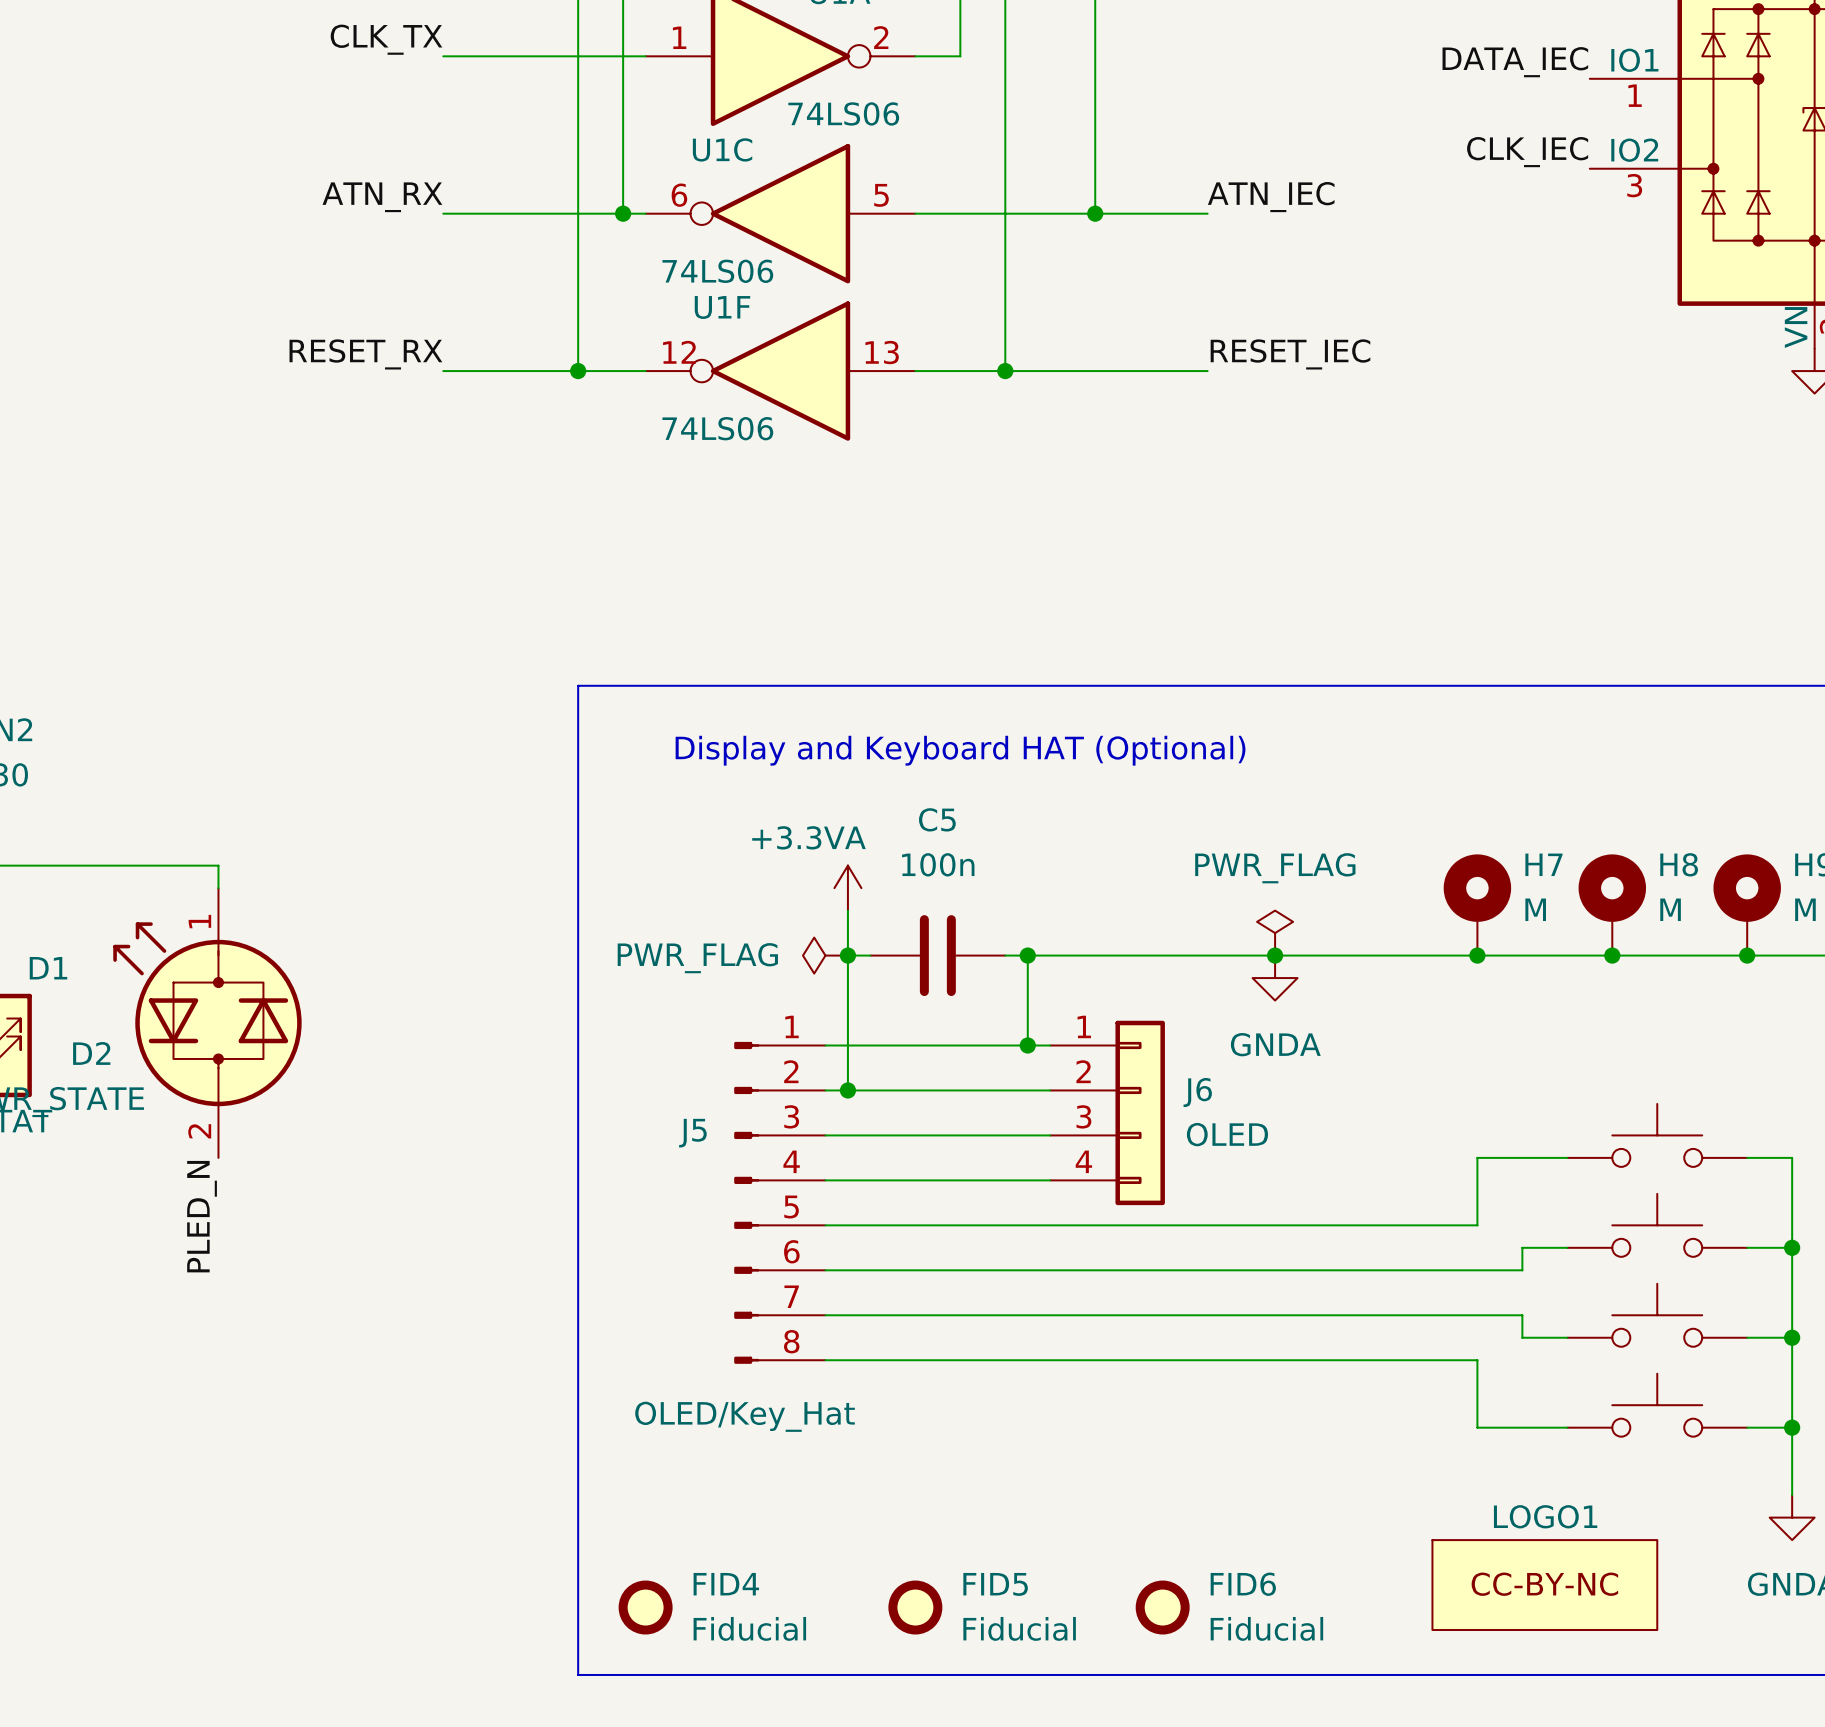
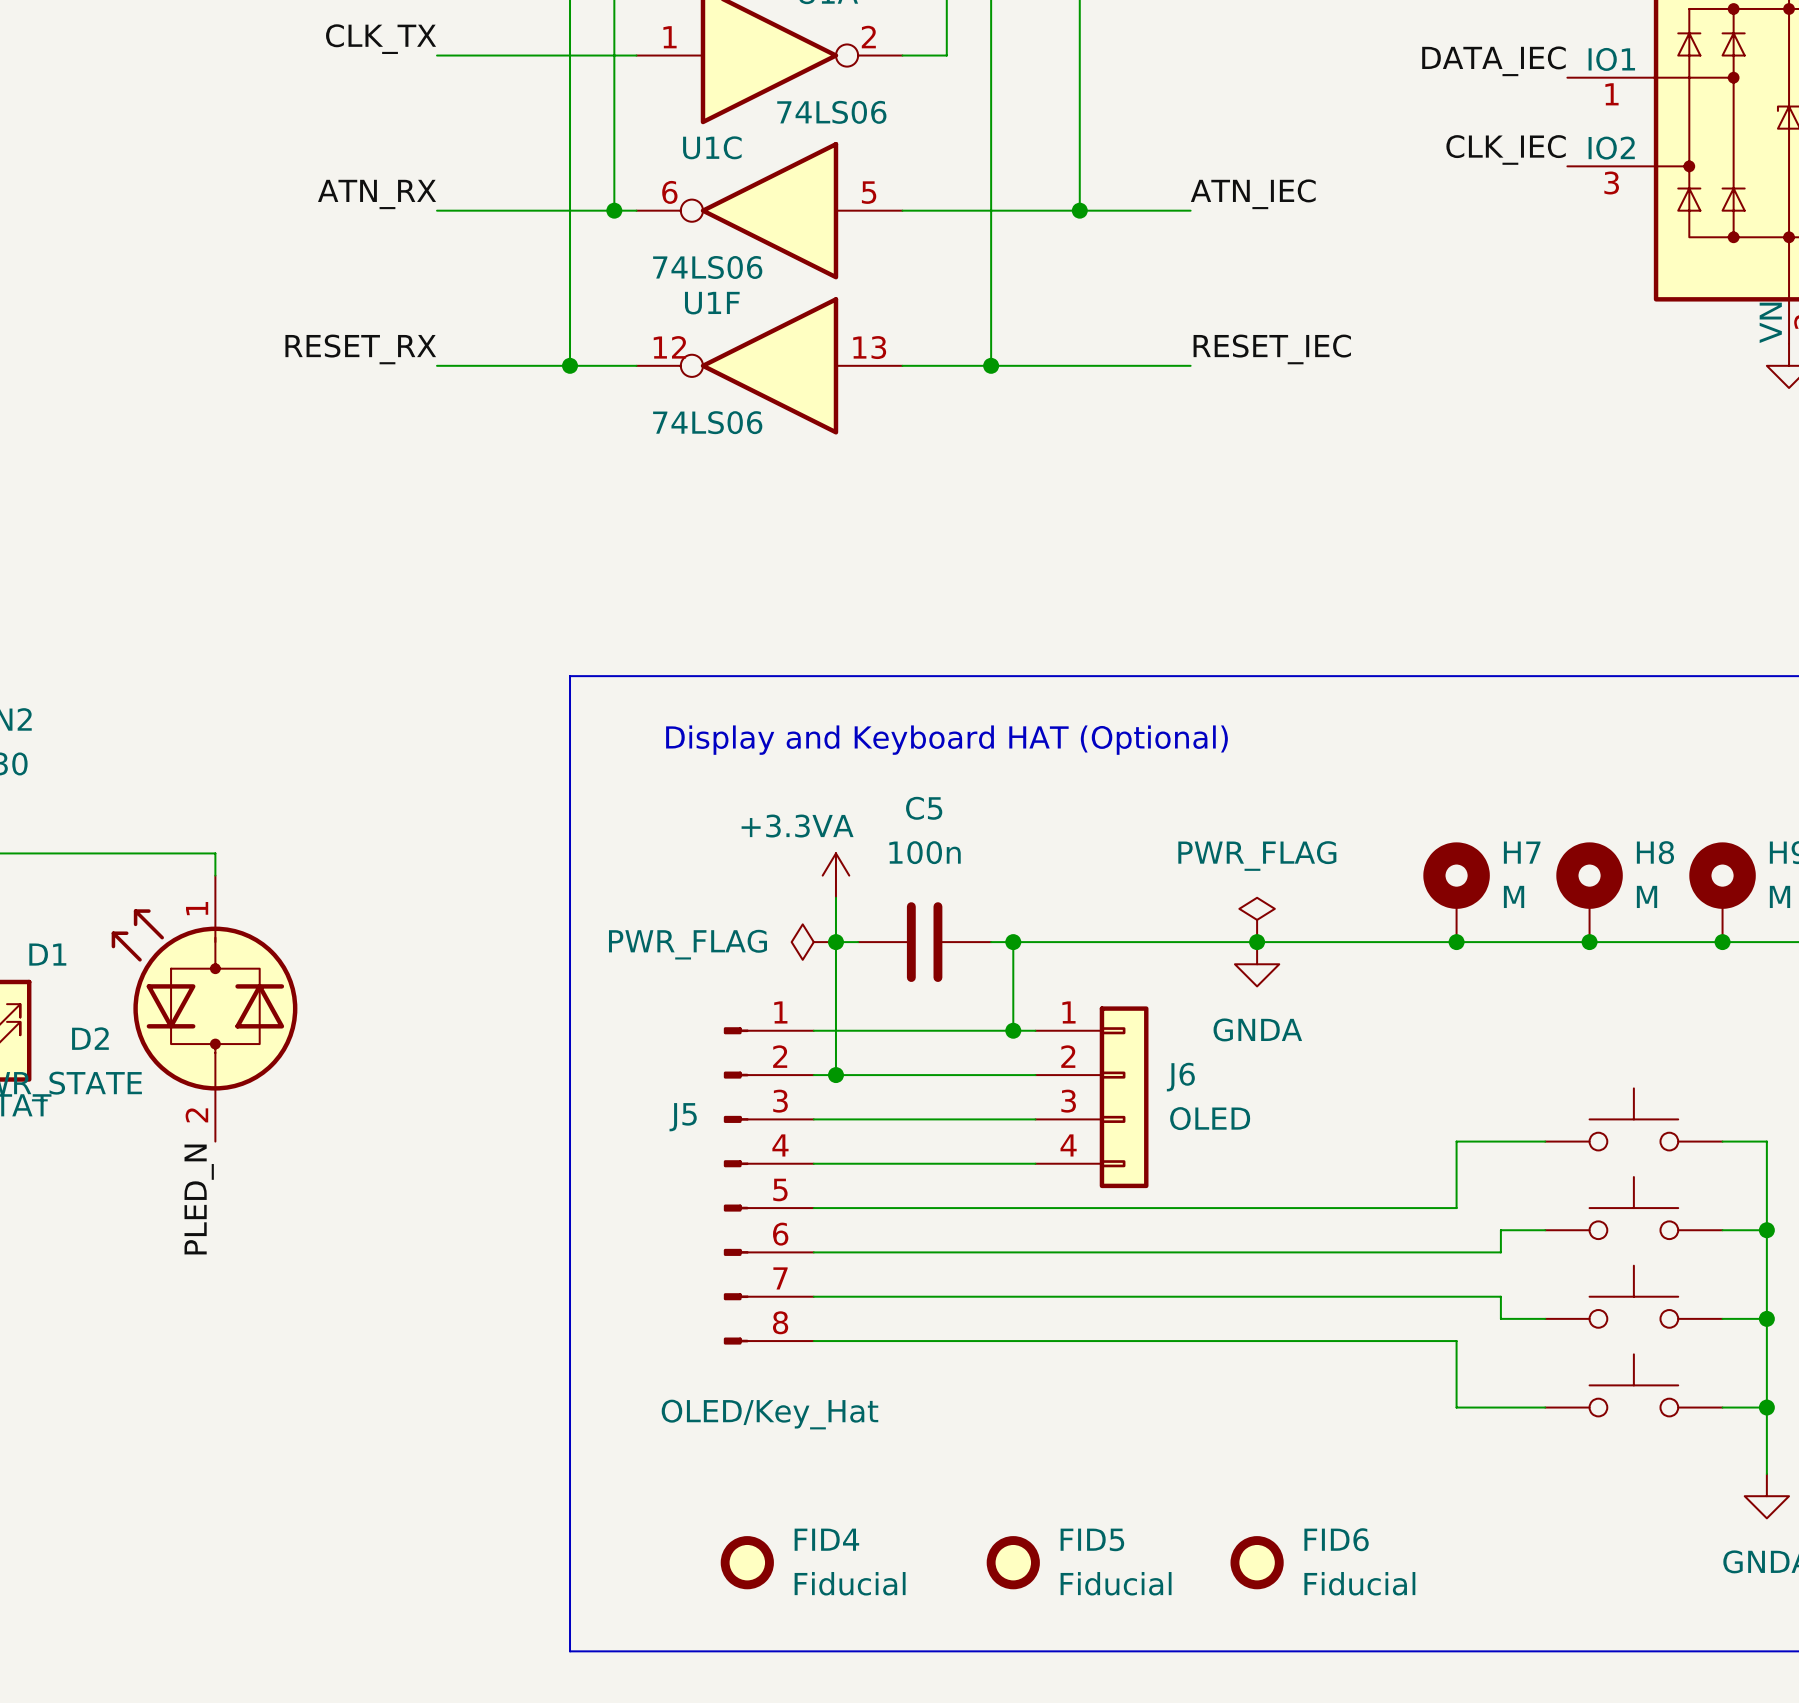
J5 value position: OLED/Key_Hat (745, 1416) -> OLED/Key_Hat (769, 1414)
LOGO1: (1544, 1585) -> none
FID4 position: (645, 1607) -> (747, 1562)
FID5 position: (915, 1607) -> (1013, 1562)
FID6 position: (1162, 1607) -> (1257, 1562)

